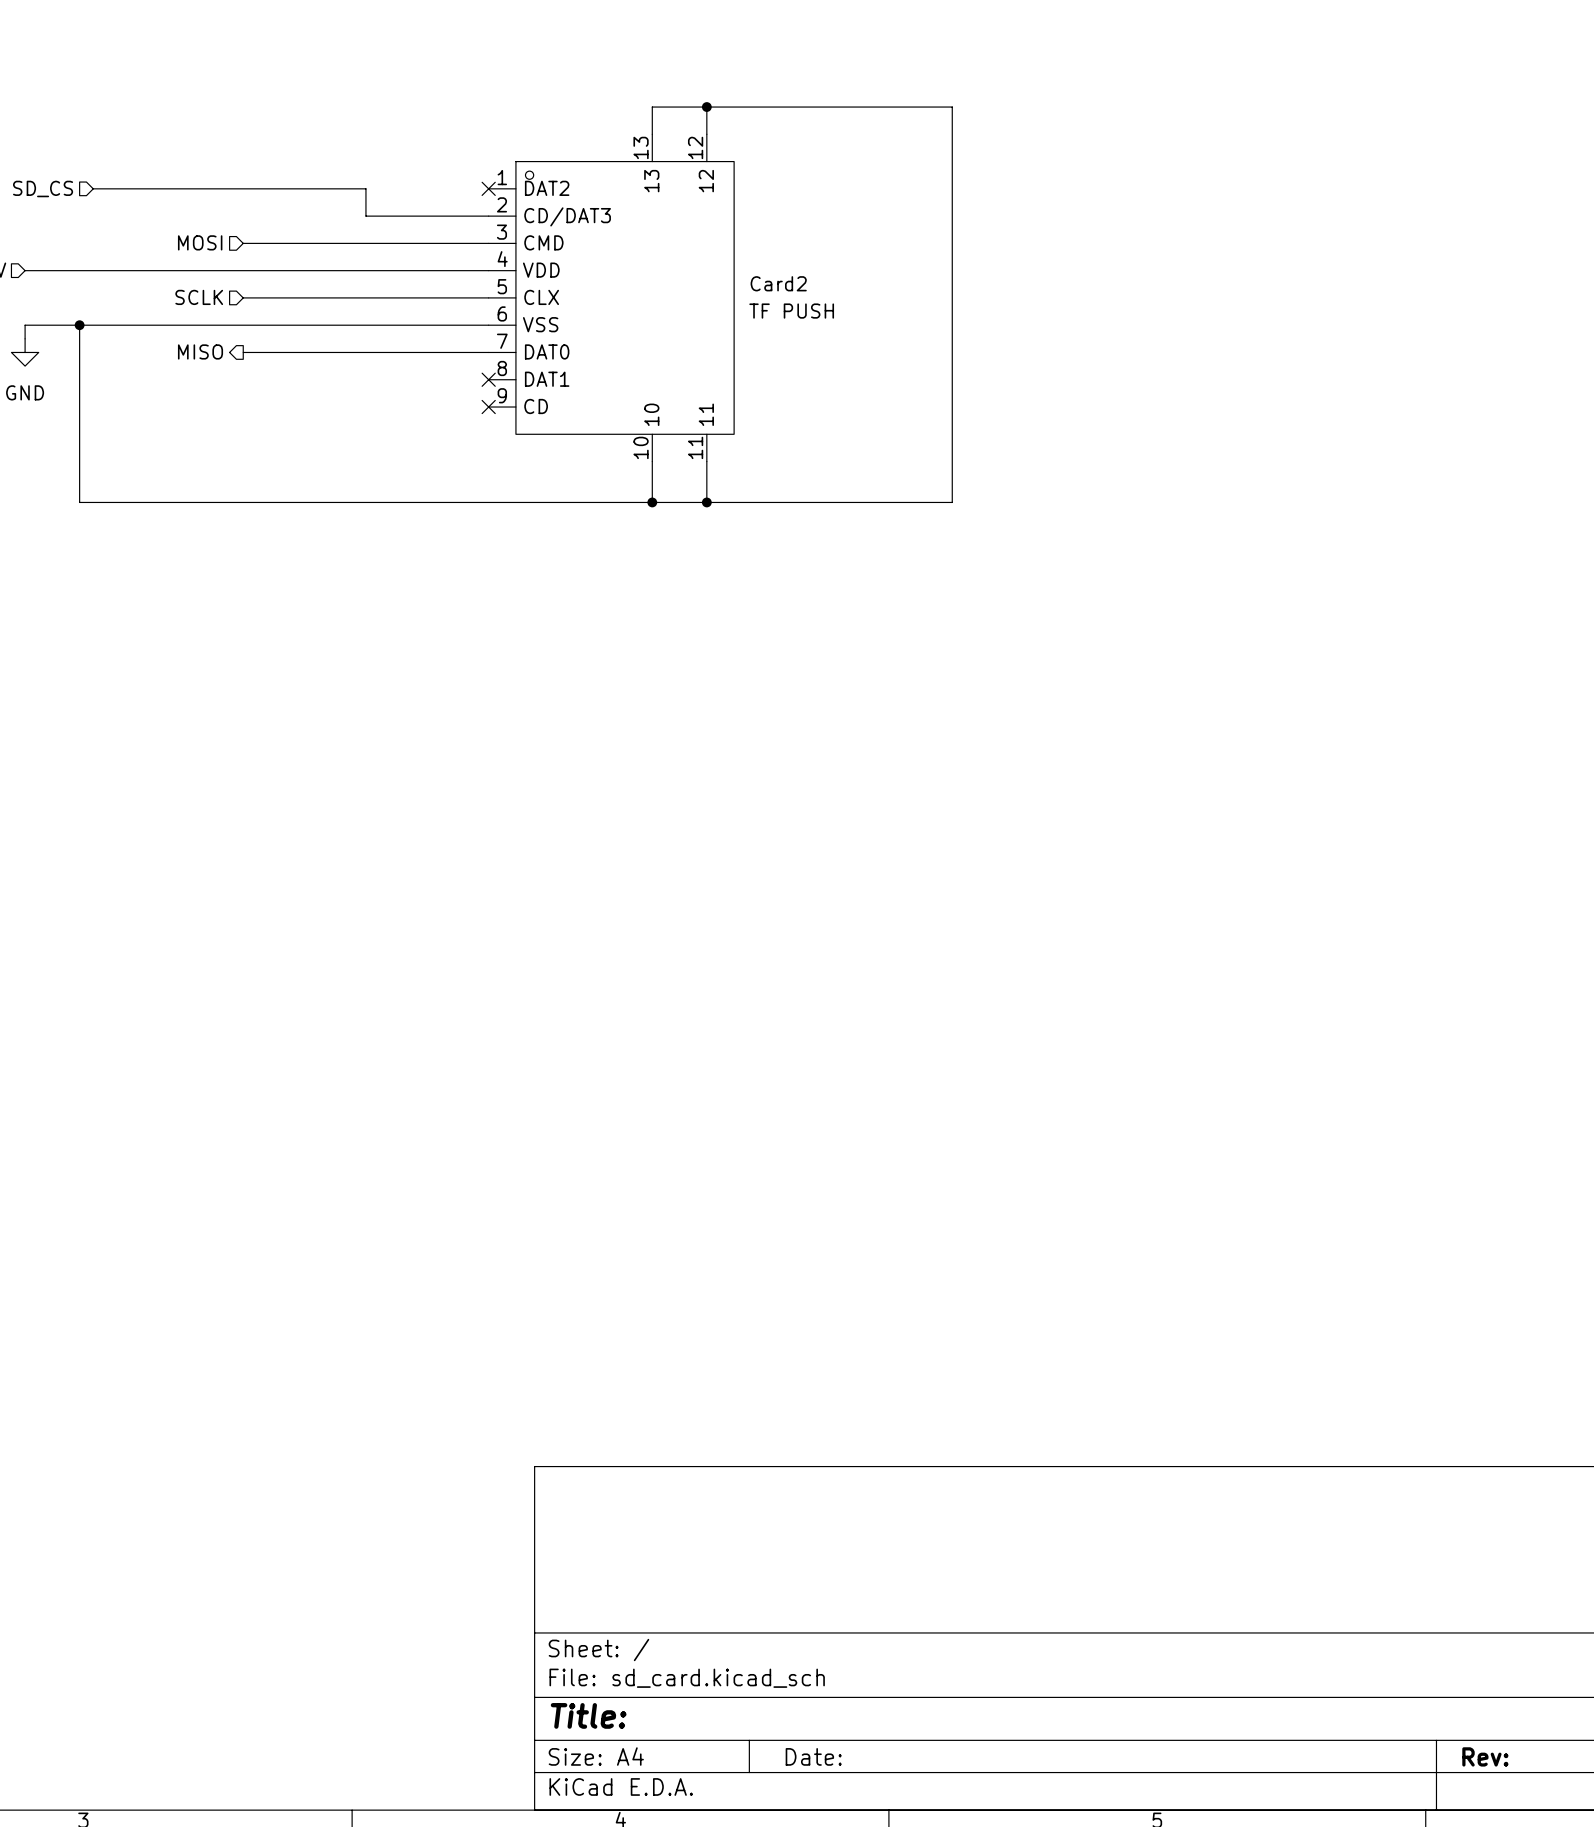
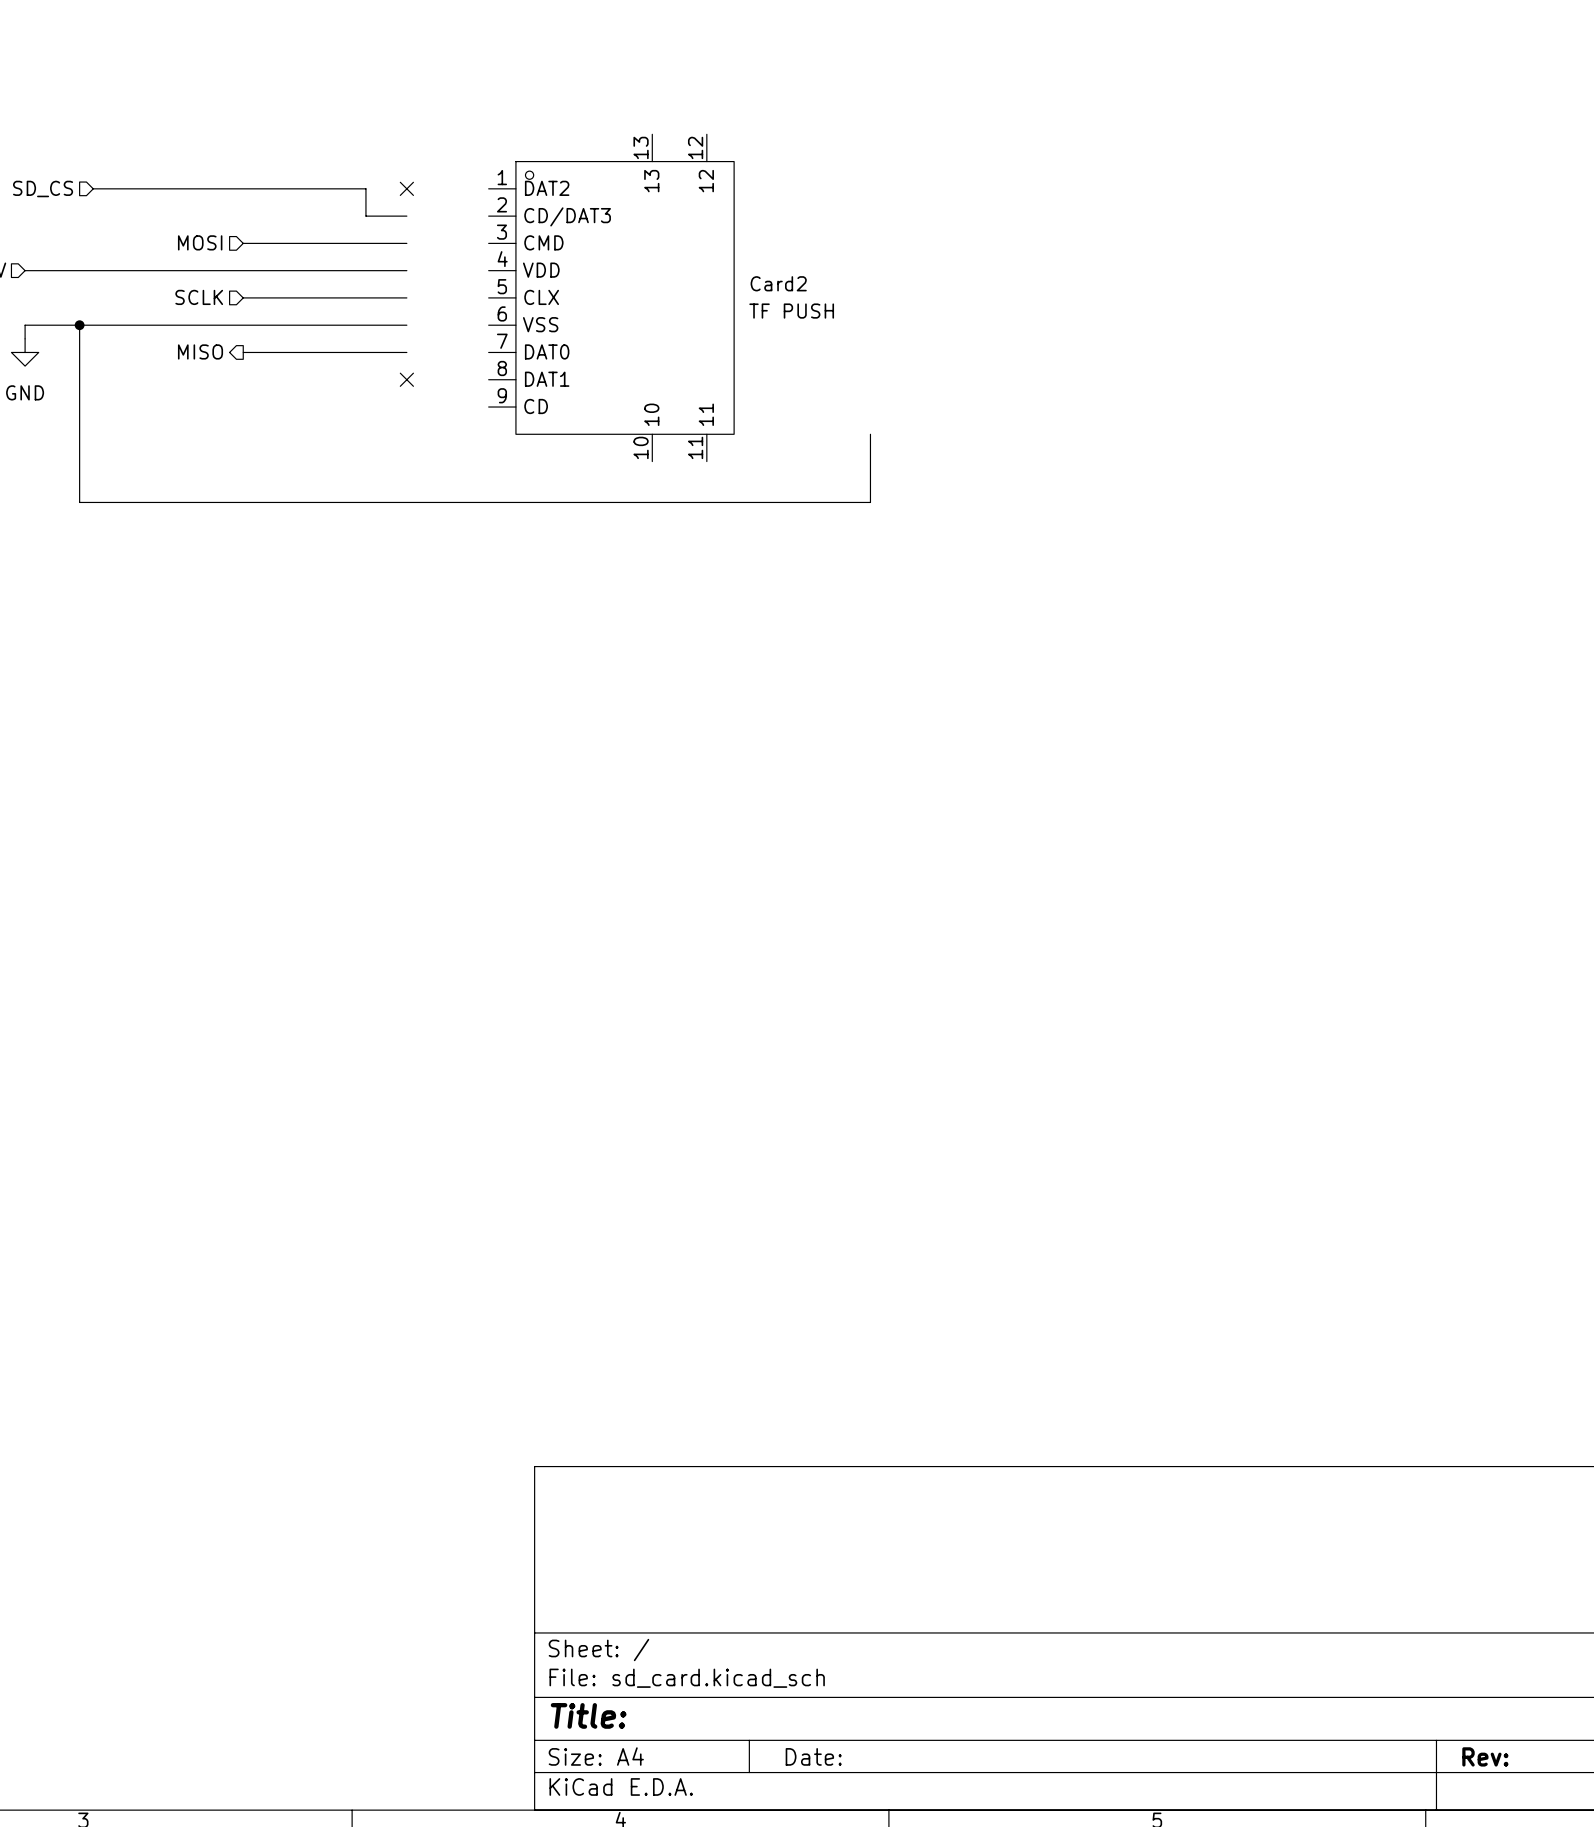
wire: (706, 107) (706, 134) -> none
junction: (706, 107) -> none
wire: (652, 134) (652, 107) (952, 107) (952, 502) (870, 502) -> (870, 434) (870, 502)
no-connect mark: none -> (406, 188)
no-connect mark: (488, 188) -> none
wire: (406, 216) (488, 216) -> none
wire: (406, 243) (488, 243) -> none
wire: (406, 270) (488, 270) -> none
wire: (406, 297) (488, 297) -> none
wire: (406, 325) (488, 325) -> none
wire: (406, 352) (488, 352) -> none
no-connect mark: none -> (406, 379)
no-connect mark: (488, 379) -> none
no-connect mark: (488, 407) -> none
wire: (652, 461) (652, 502) -> none
wire: (706, 461) (706, 502) -> none
junction: (652, 502) -> none
junction: (706, 502) -> none

